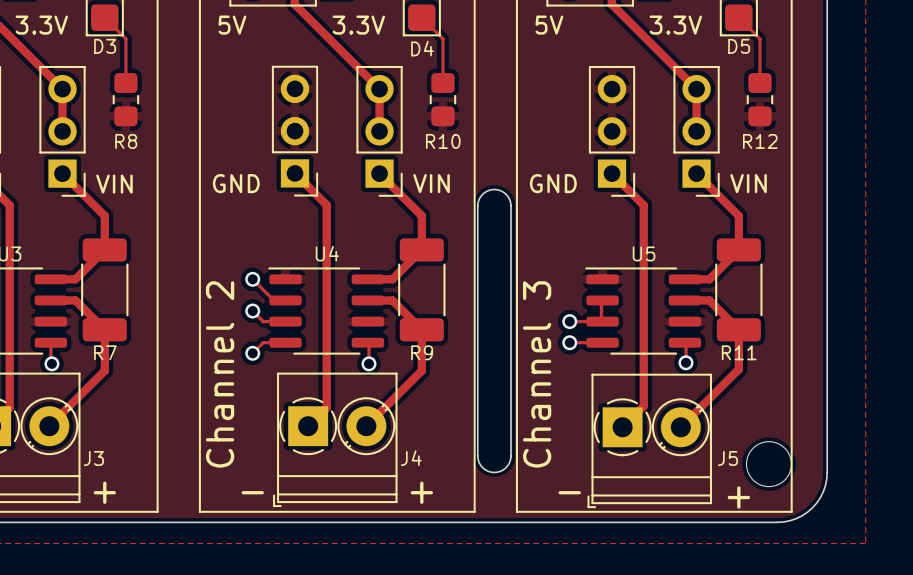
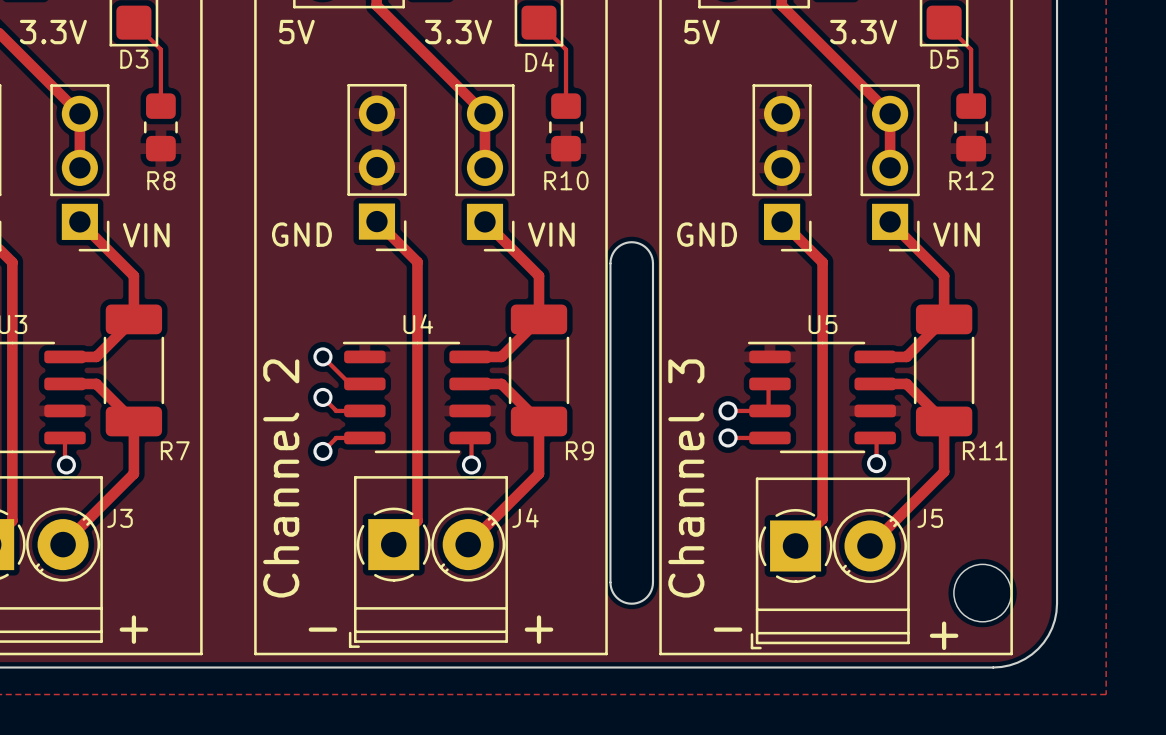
R7 name position: R7 (105, 352) -> R7 (175, 450)
R9 name position: R9 (422, 352) -> R9 (579, 450)
R11 name position: R11 (739, 352) -> R11 (985, 450)
J3 name position: J3 (93, 458) -> J3 (119, 518)
J4 name position: J4 (411, 458) -> J4 (525, 517)
J5 name position: J5 (727, 458) -> J5 (930, 518)

